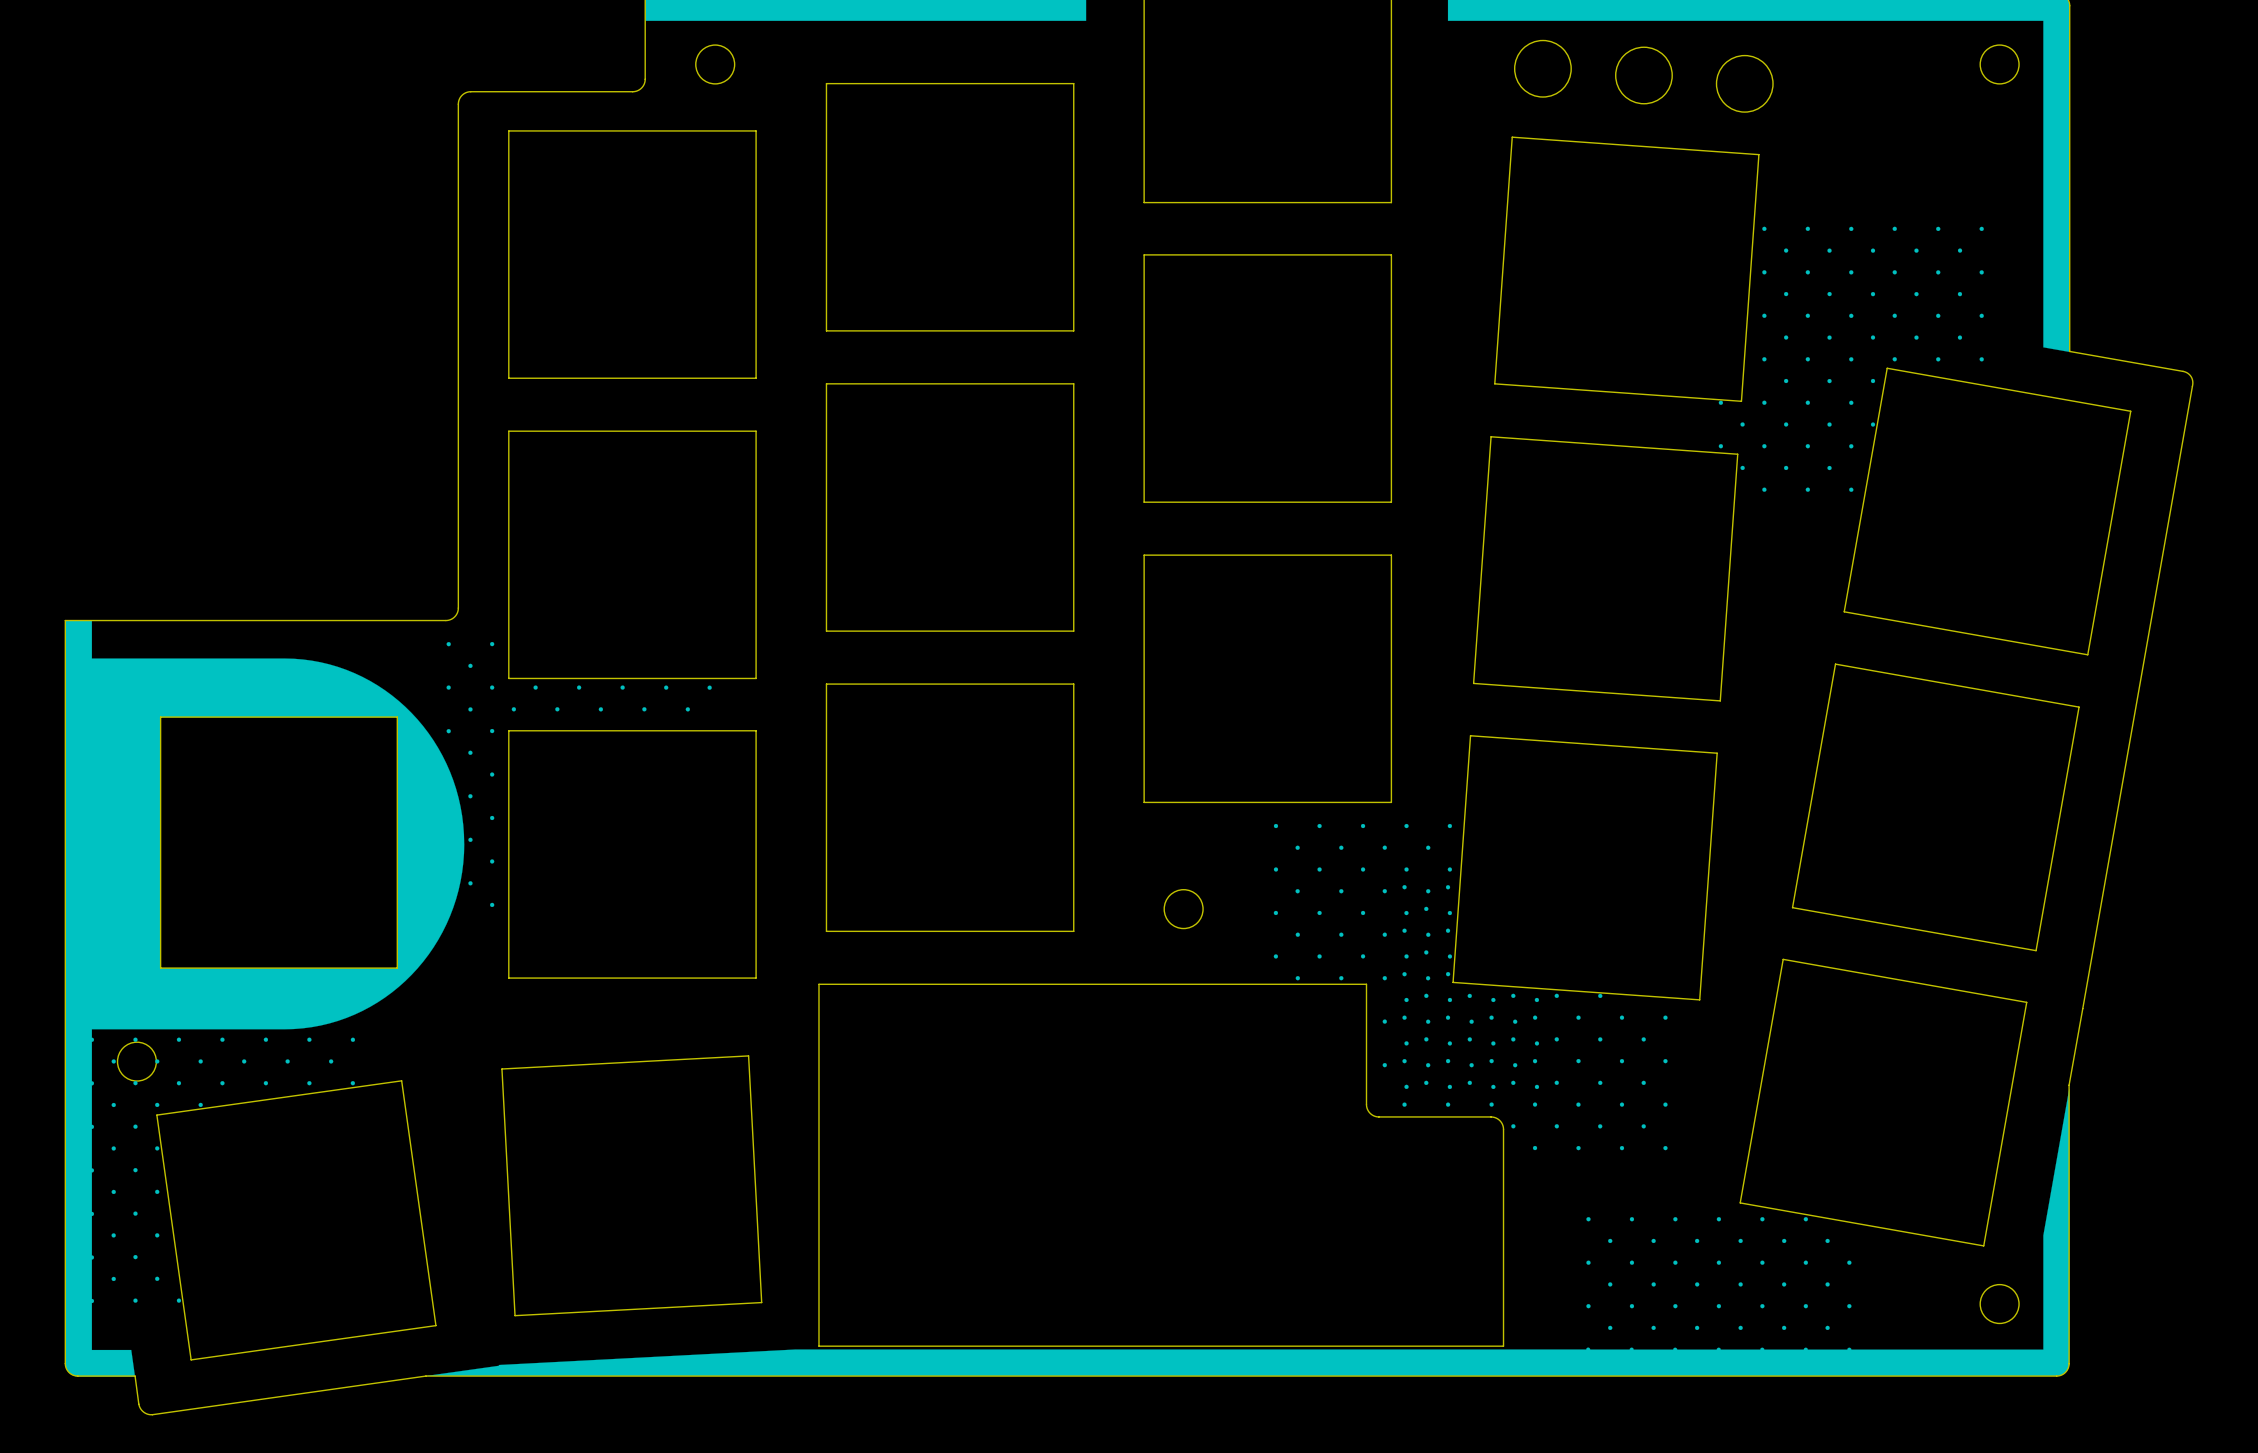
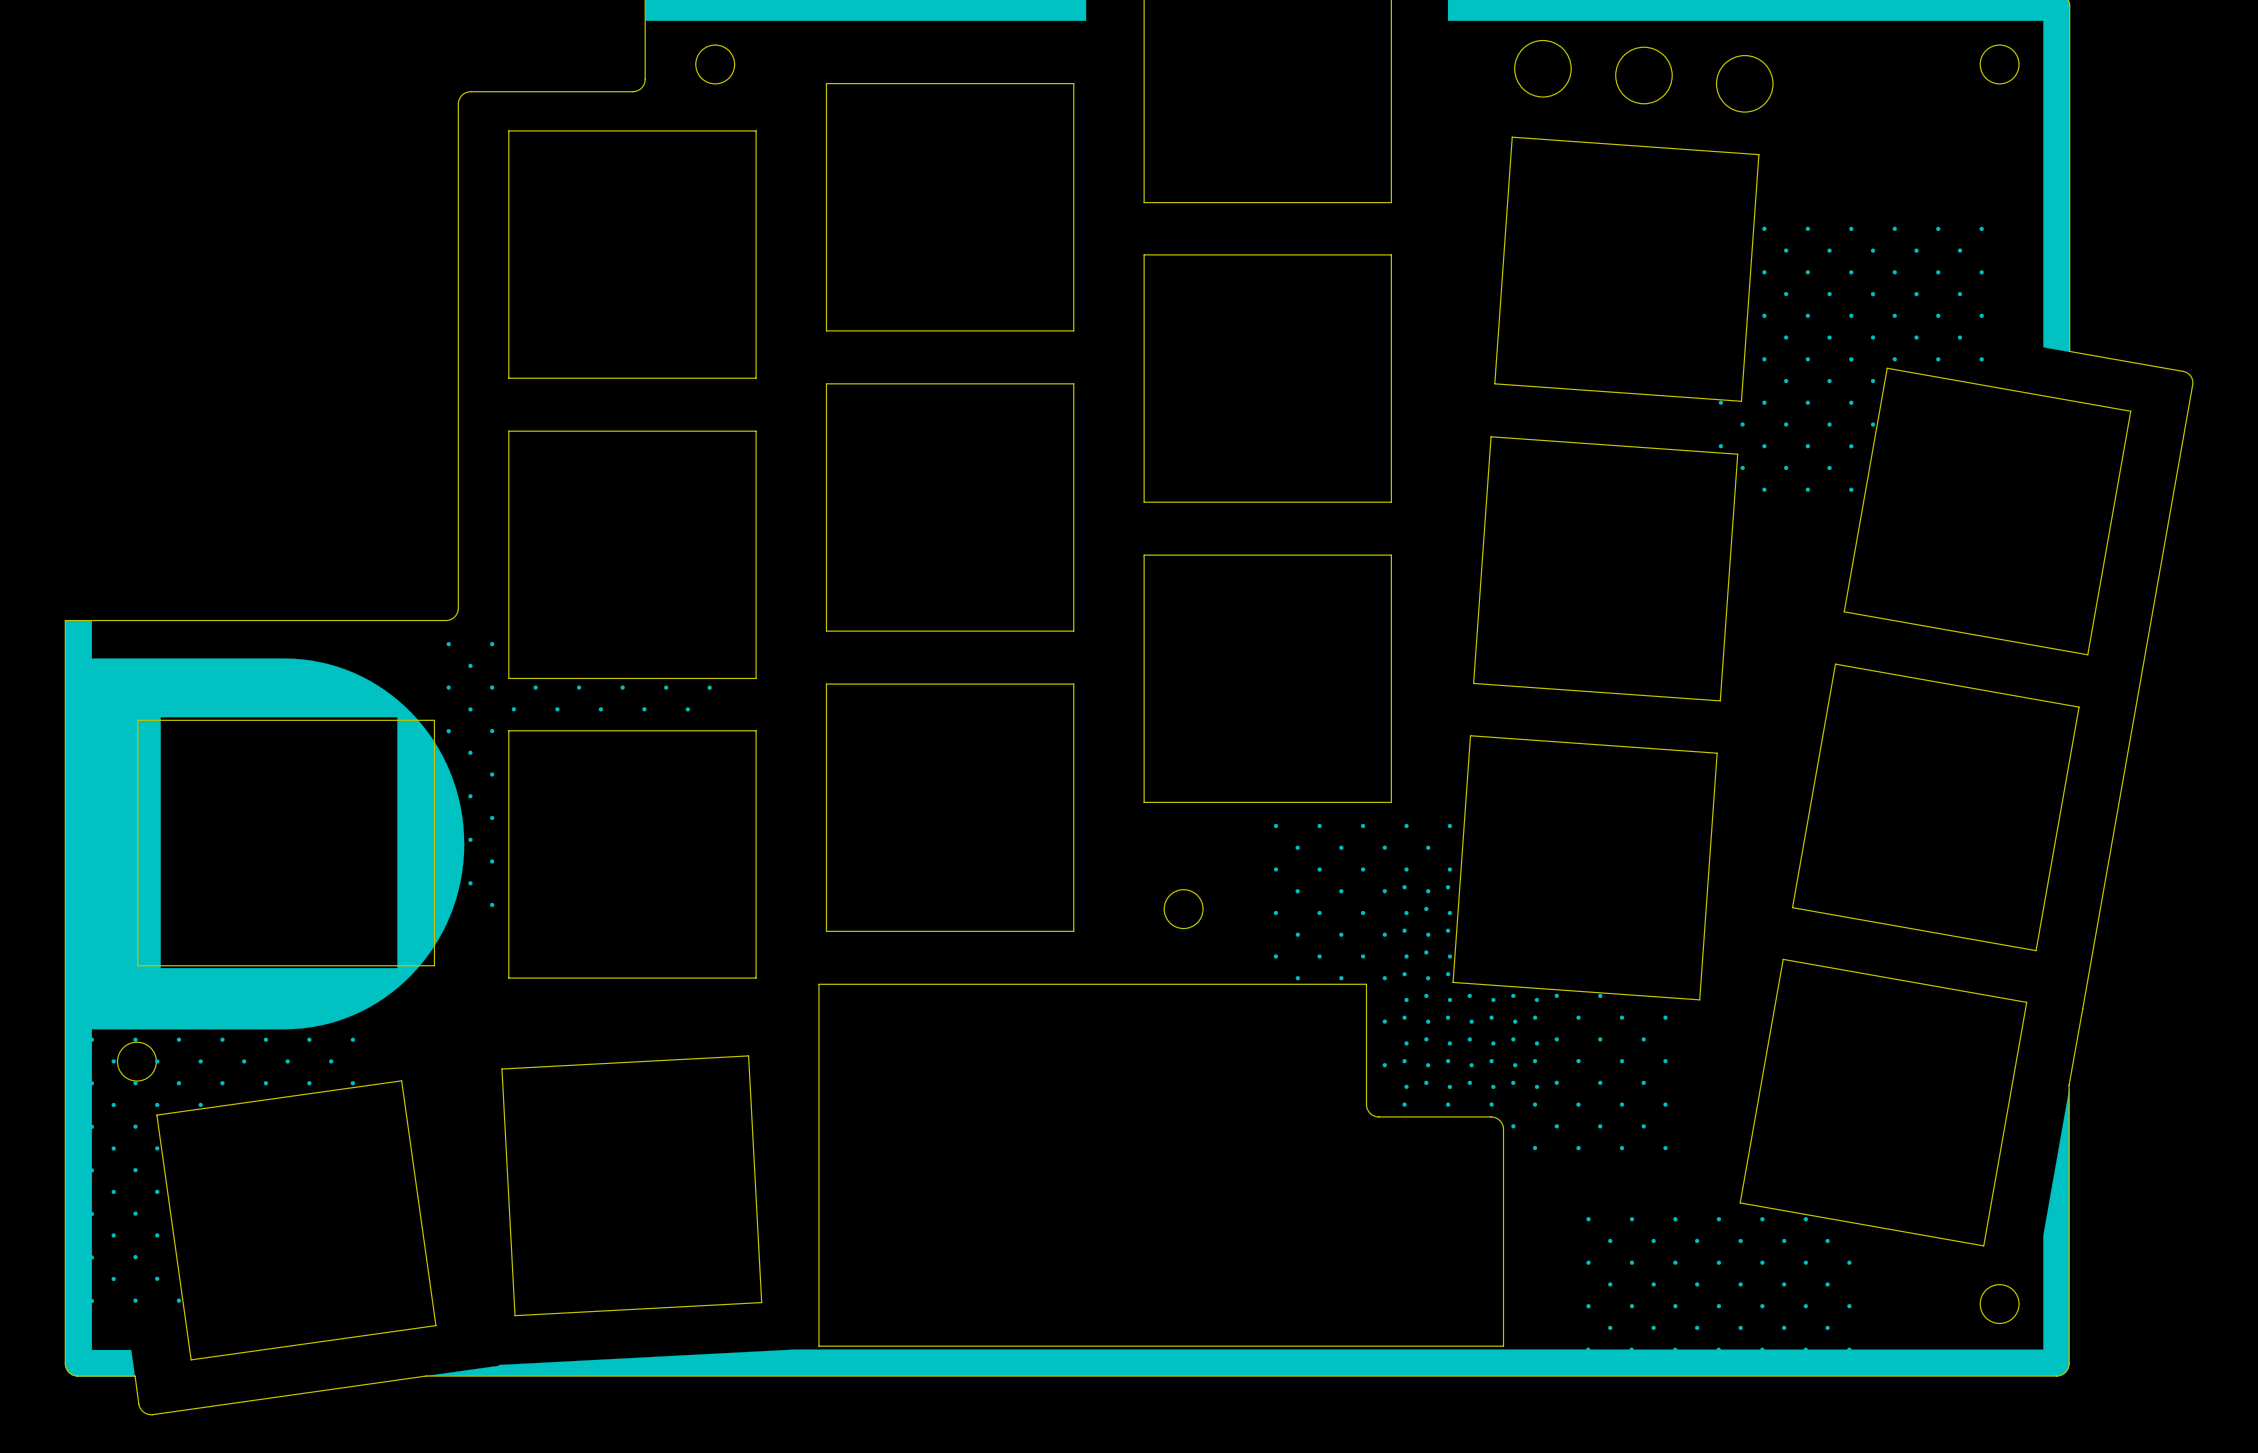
board edge: (160, 717) (397, 717) (397, 968) (160, 968) (160, 717) -> (137, 720) (137, 965) (434, 965) (434, 720) (137, 720)

